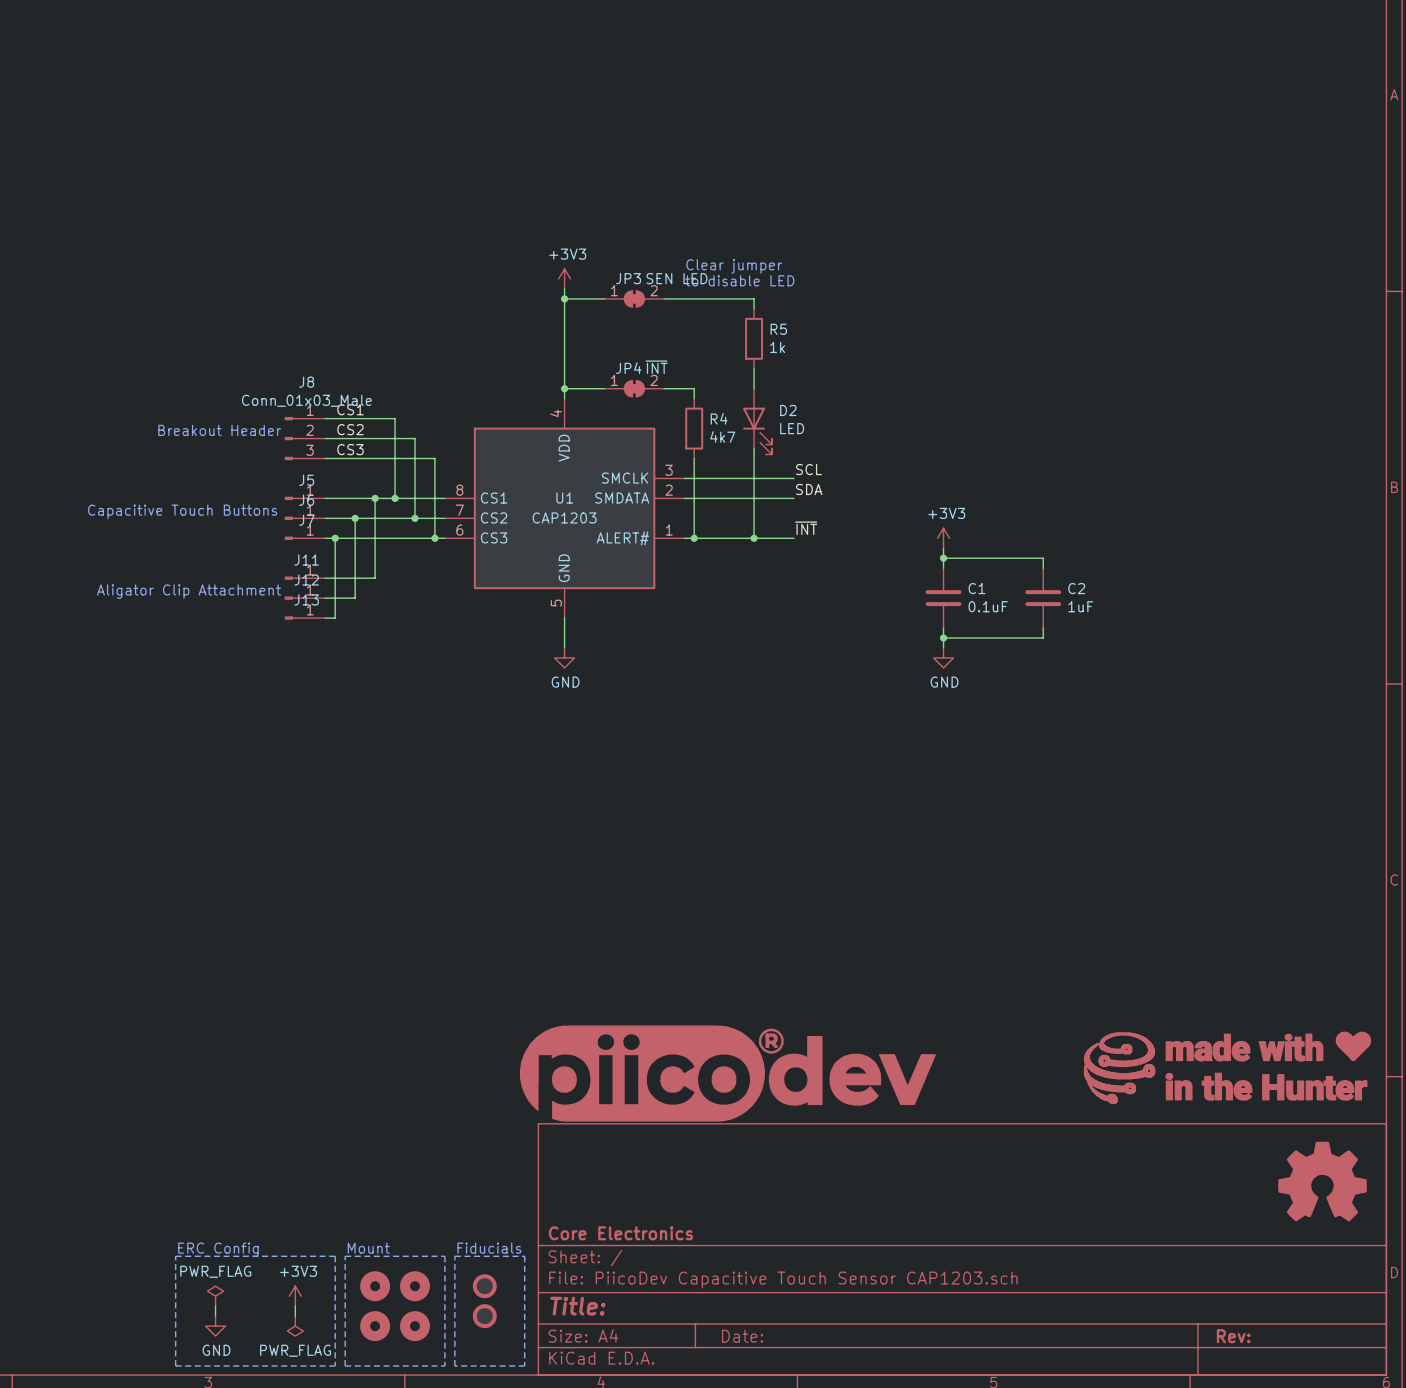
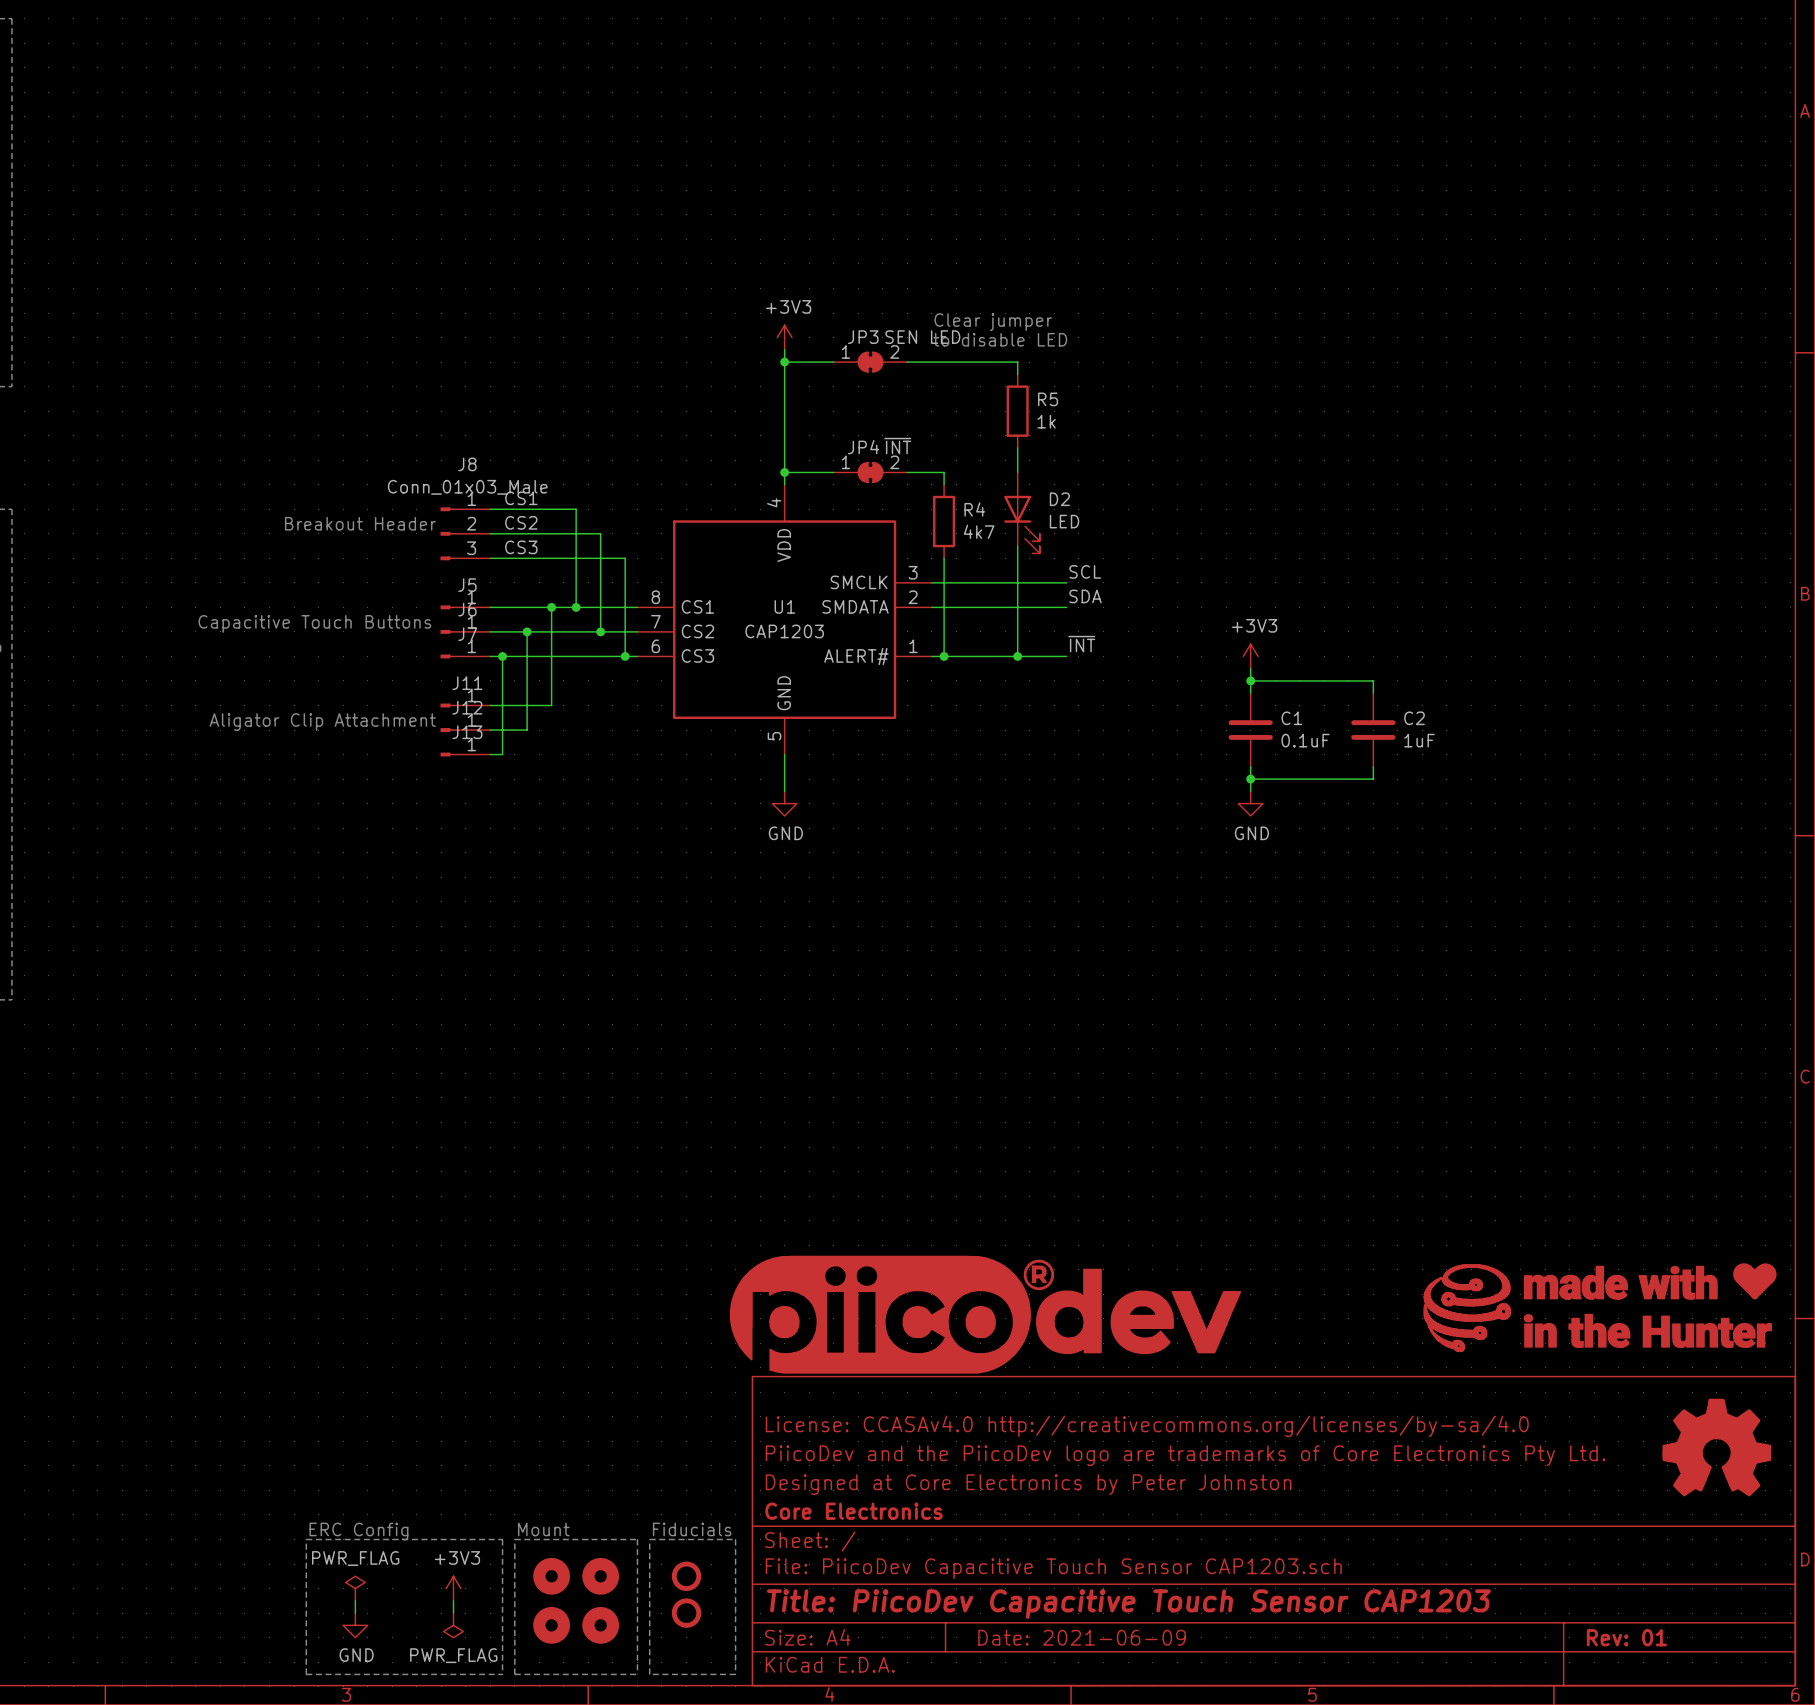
title block: none -> License: CCASAv4.0 http://creativecommons.org/licenses/by-sa/4.0 (1147, 1426)
title block: none -> PiicoDev and the PiicoDev logo are trademarks of Core Electronics Pty Ltd. (1185, 1455)
title block: none -> Designed at Core Electronics by Peter Johnston (1028, 1484)
title block: Title: (577, 1306) -> Title: PiicoDev Capacitive Touch Sensor CAP1203 (1128, 1604)
title block: Date: (742, 1336) -> Date: 2021-06-09 (1082, 1637)
title block: Rev: (1233, 1336) -> Rev: 01 (1626, 1637)

